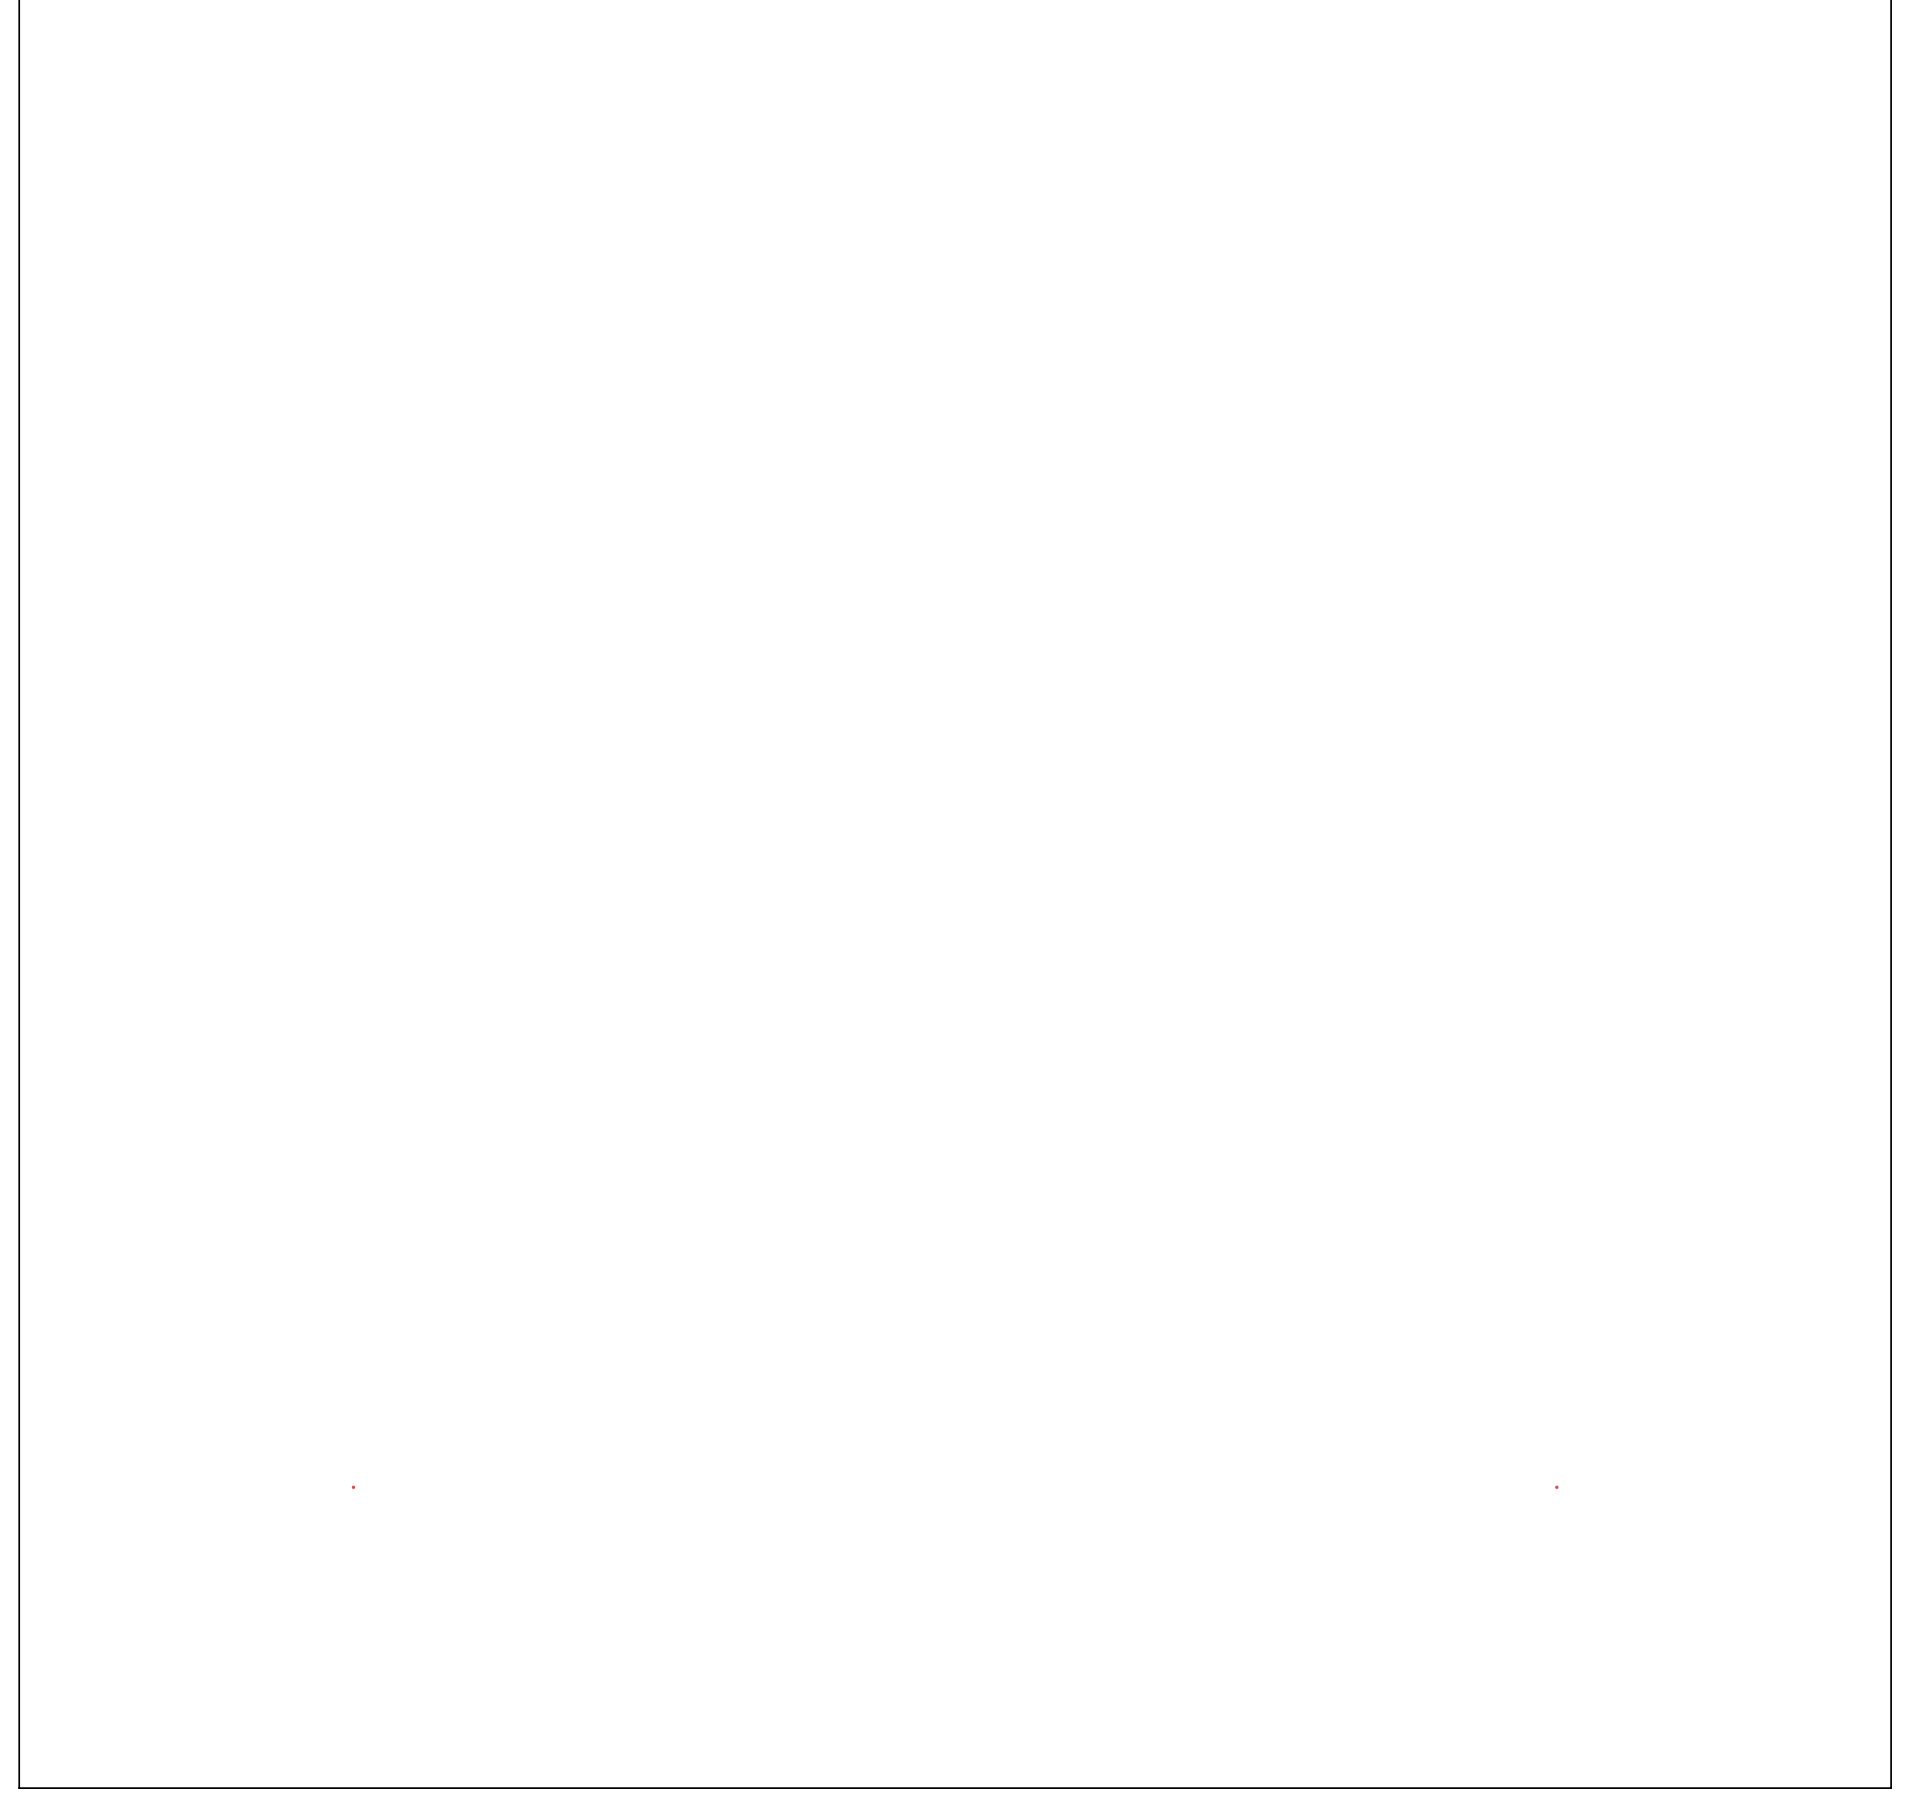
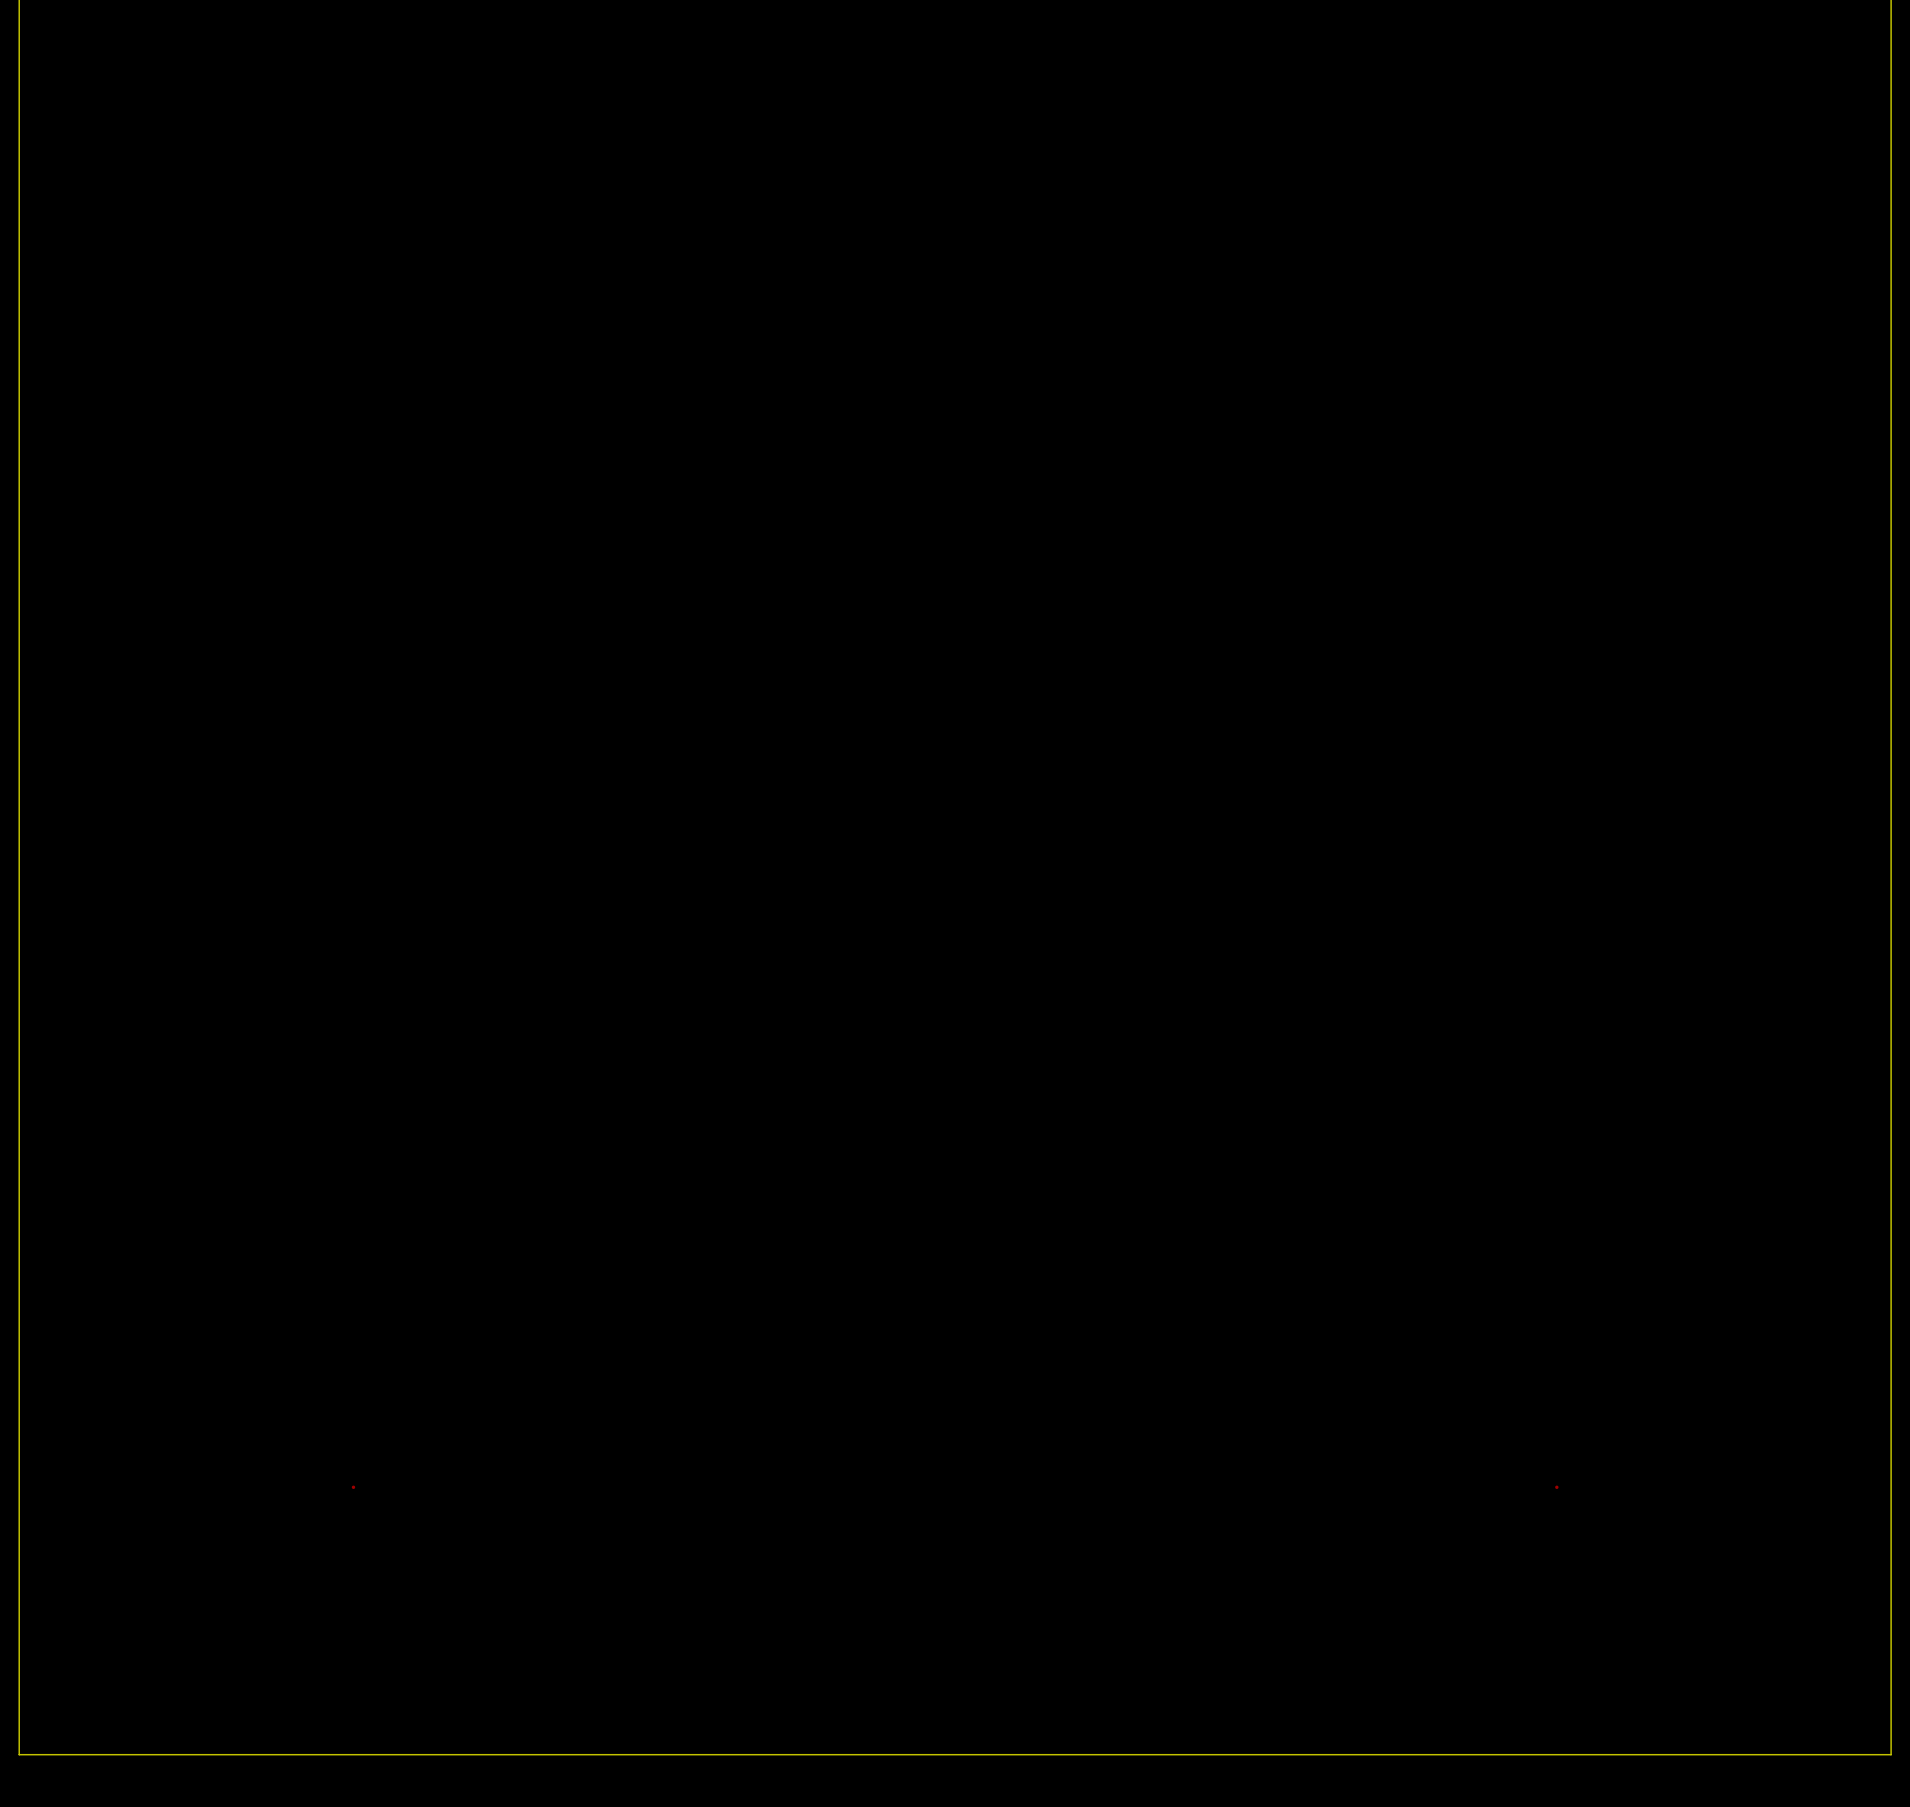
board edge: (19, 1754) (19, 1788) (1891, 1788) (1891, 1754) -> (19, 1754) (1891, 1754)

